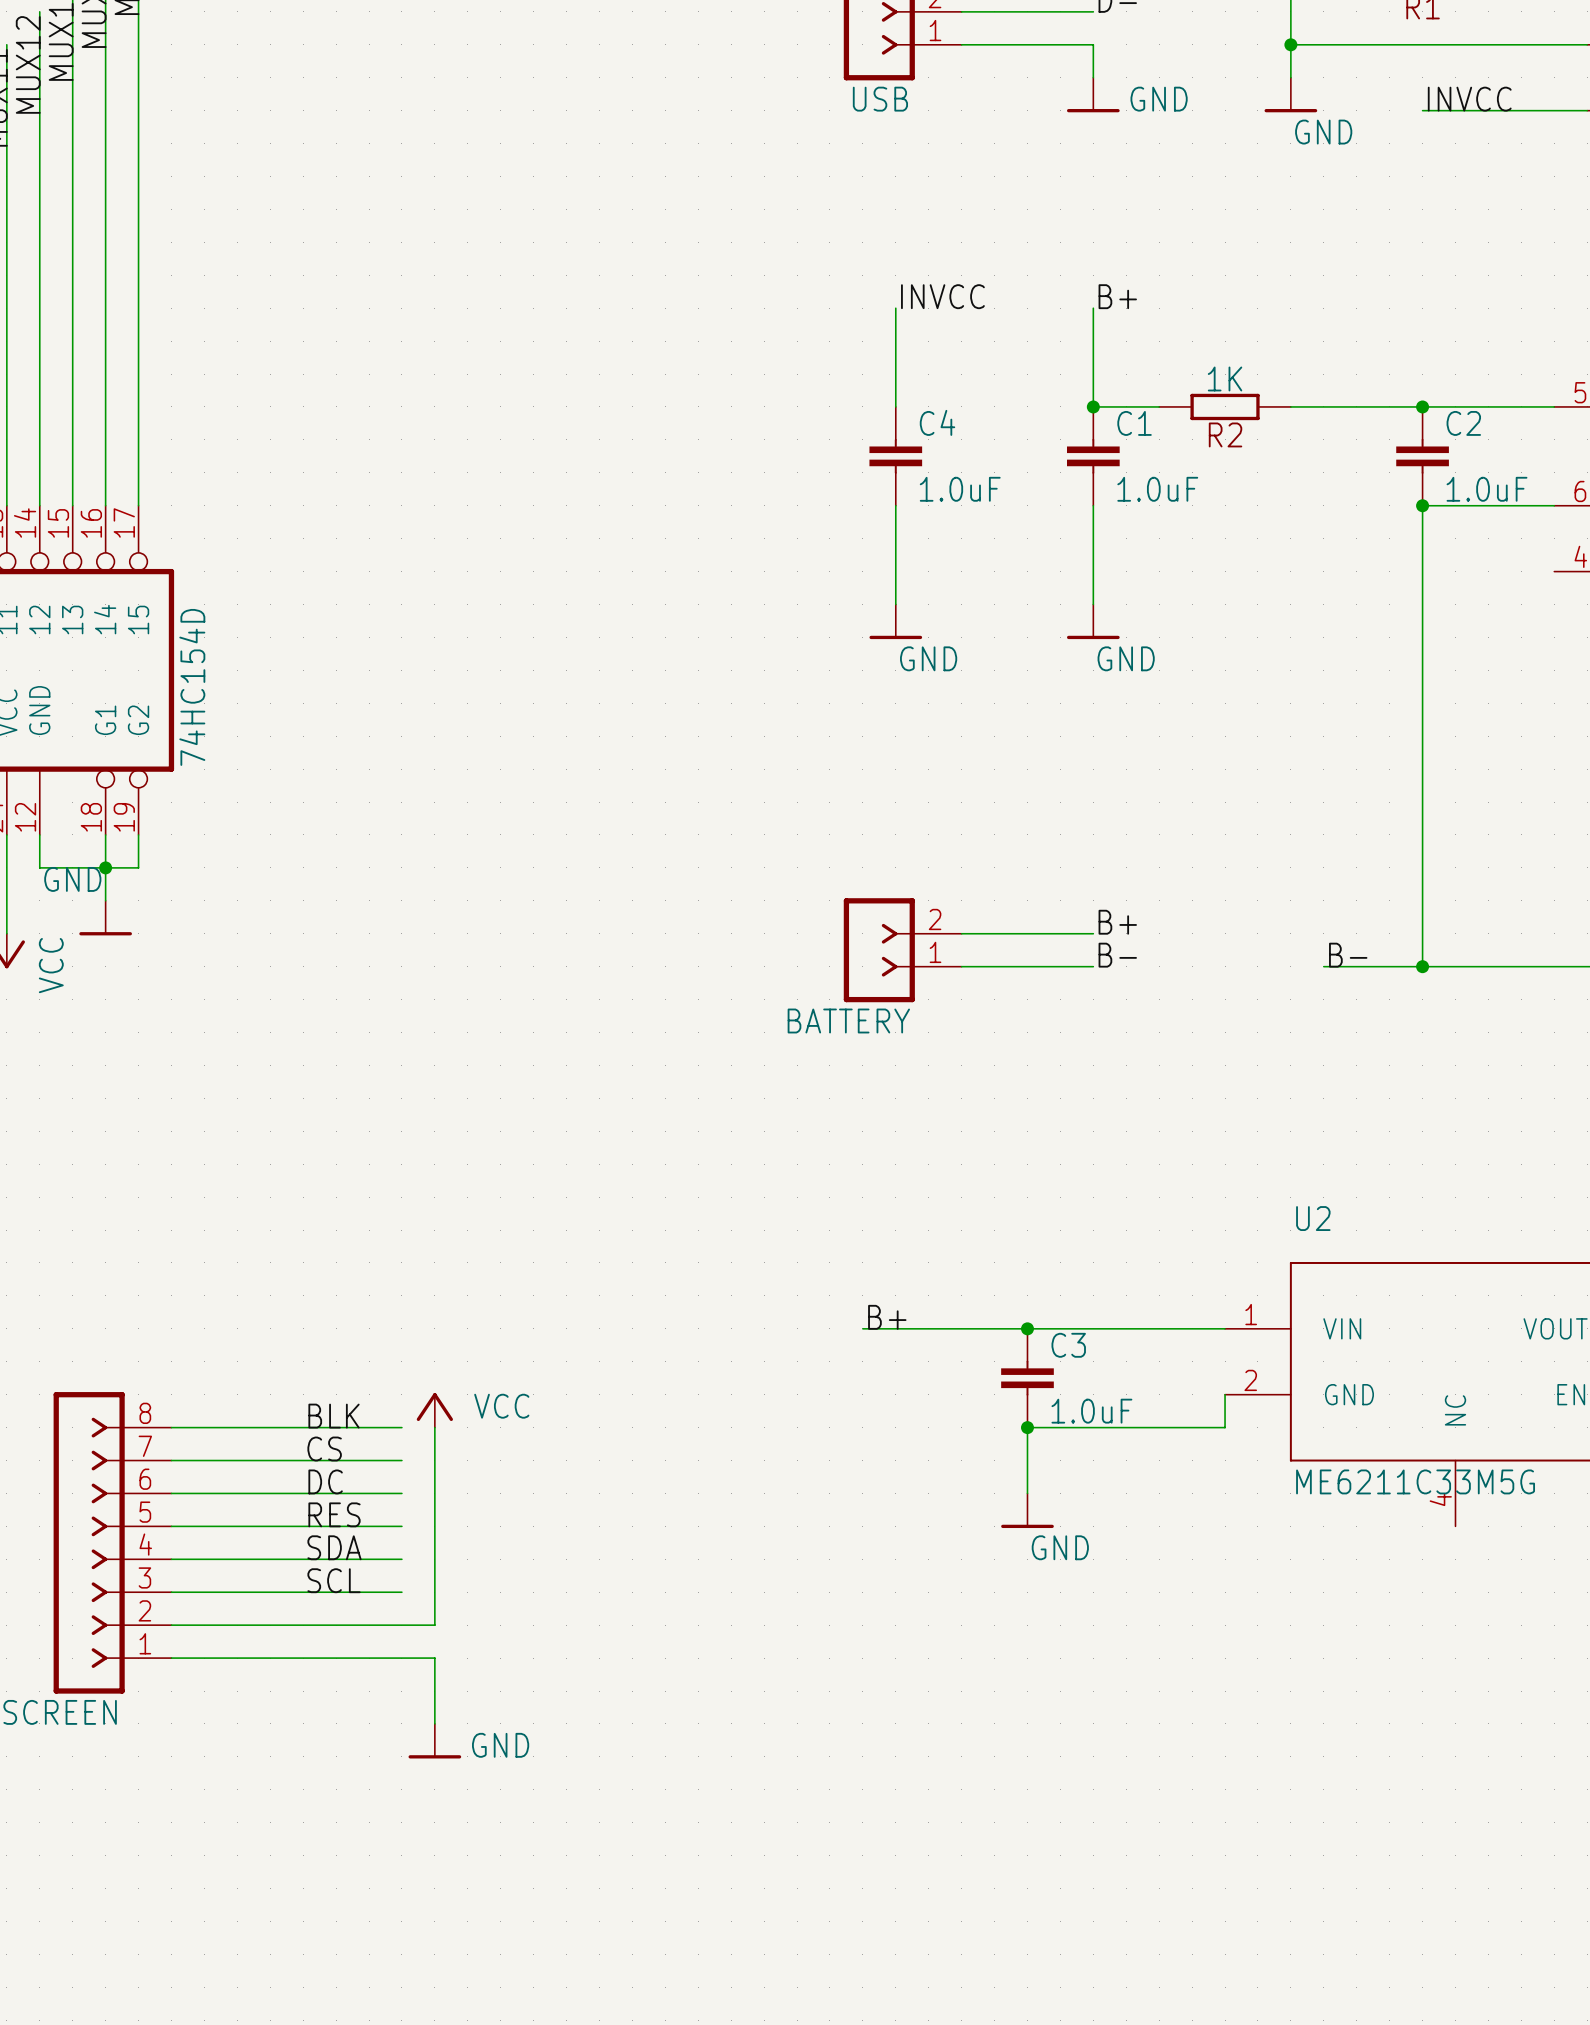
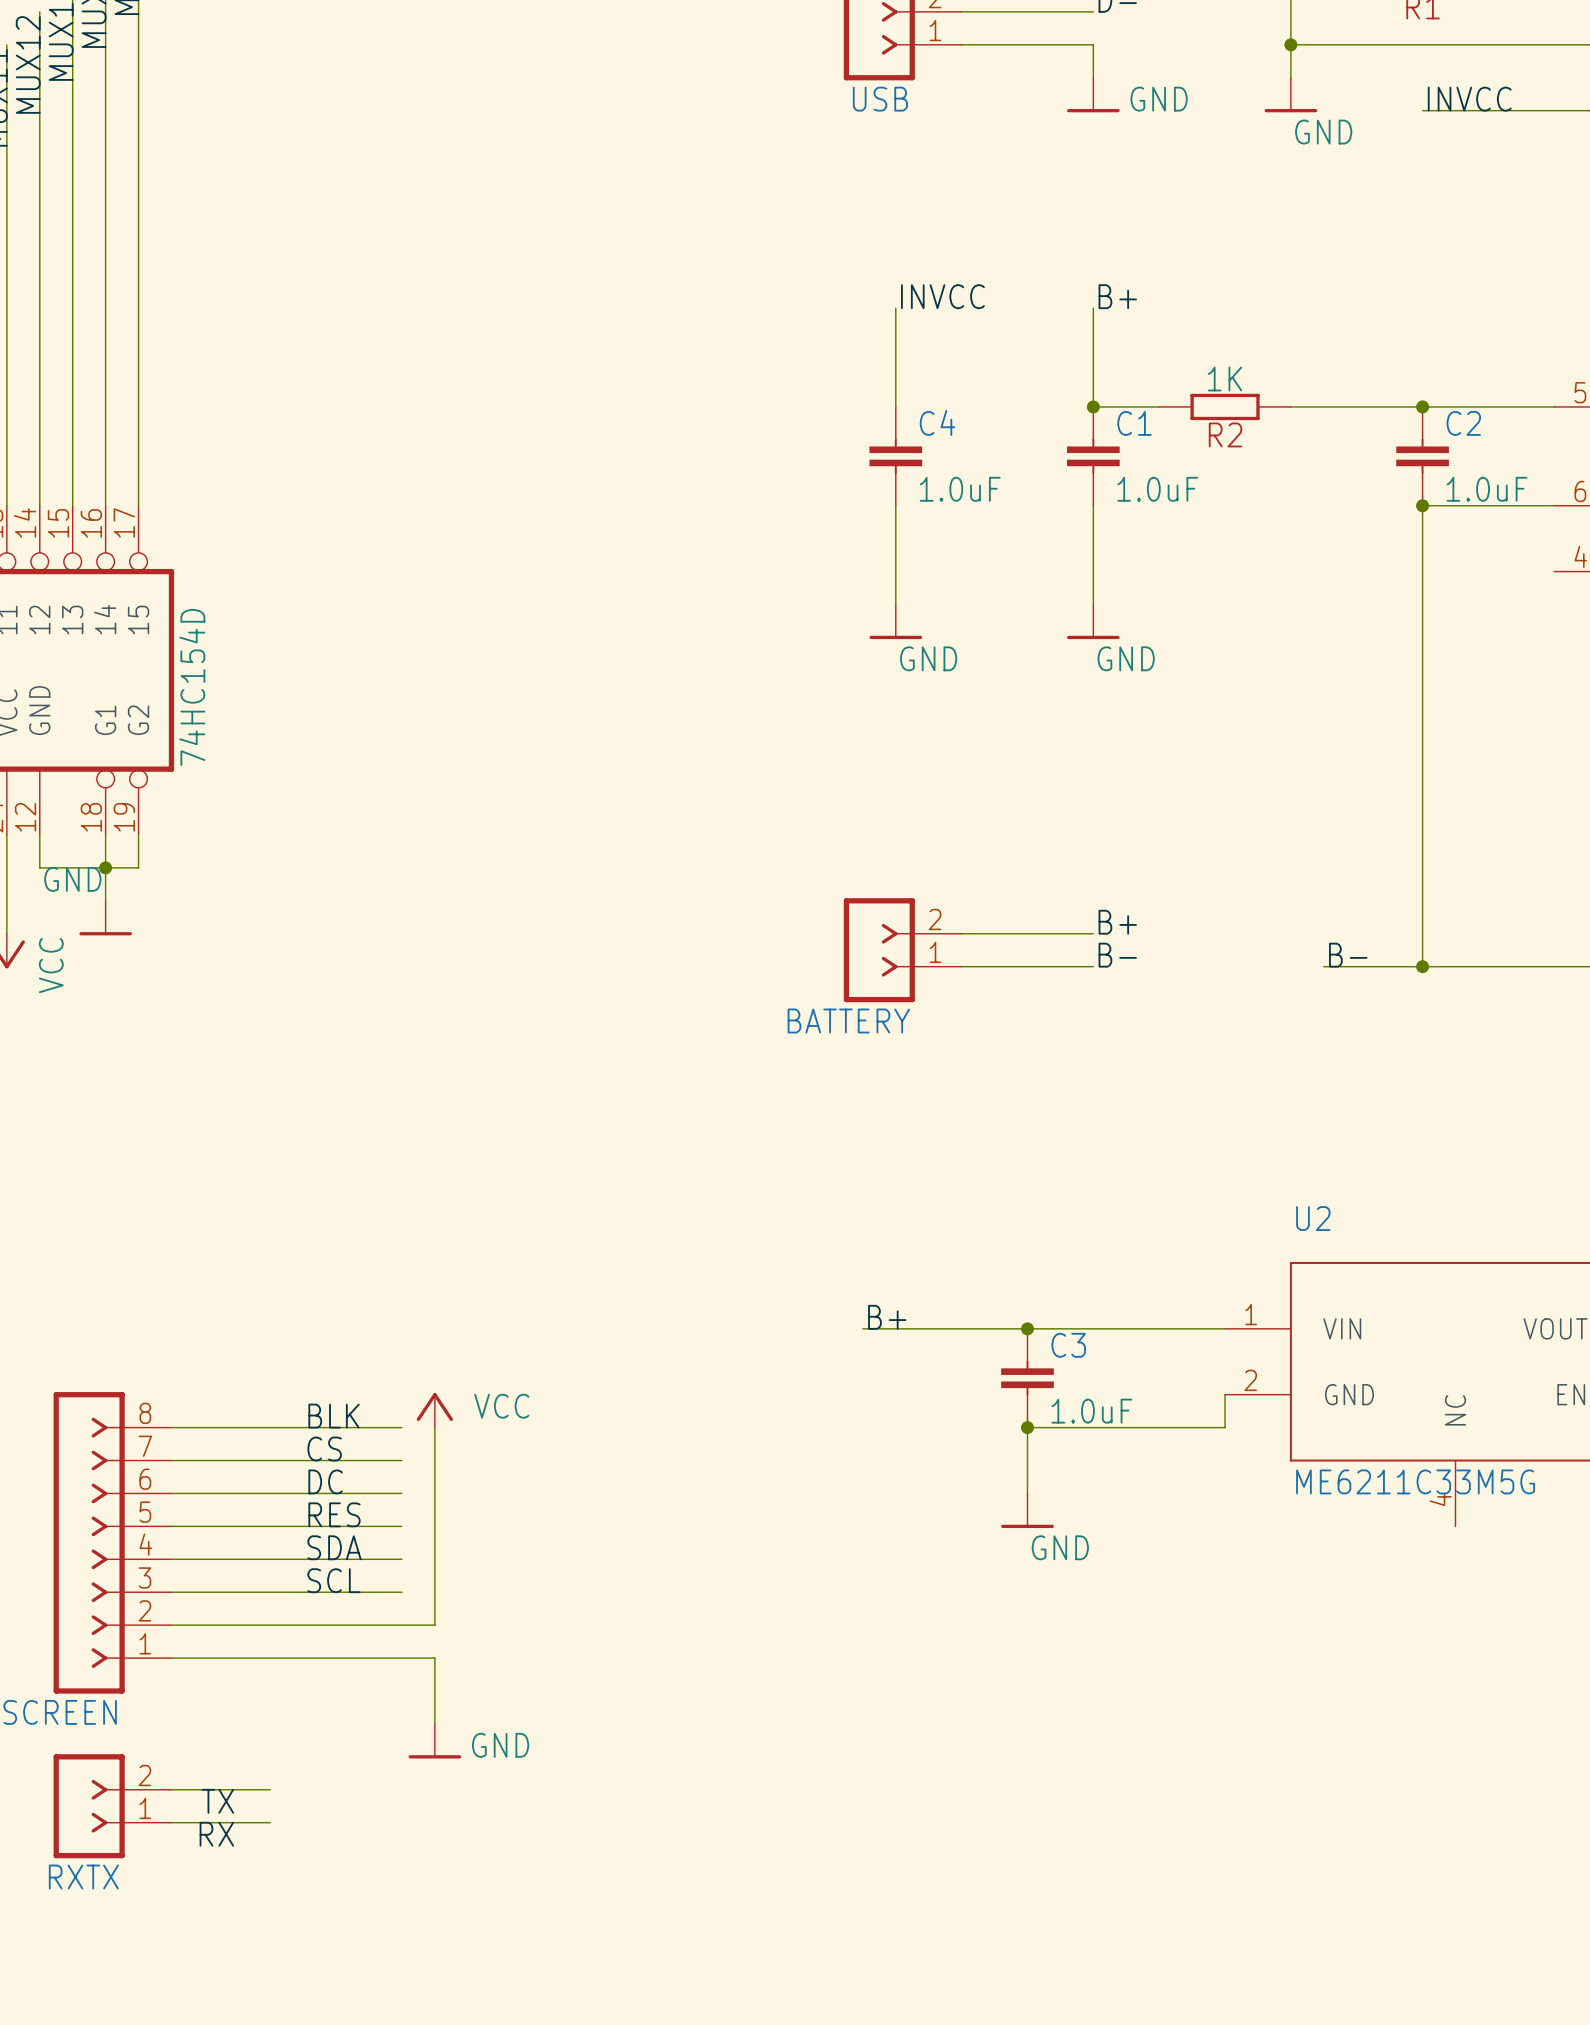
wire: none -> (171, 1789) (270, 1789)
label: none -> TX (217, 1801)
RXTX: none -> (112, 1806)
wire: none -> (171, 1822) (270, 1822)
label: none -> RX (216, 1834)

